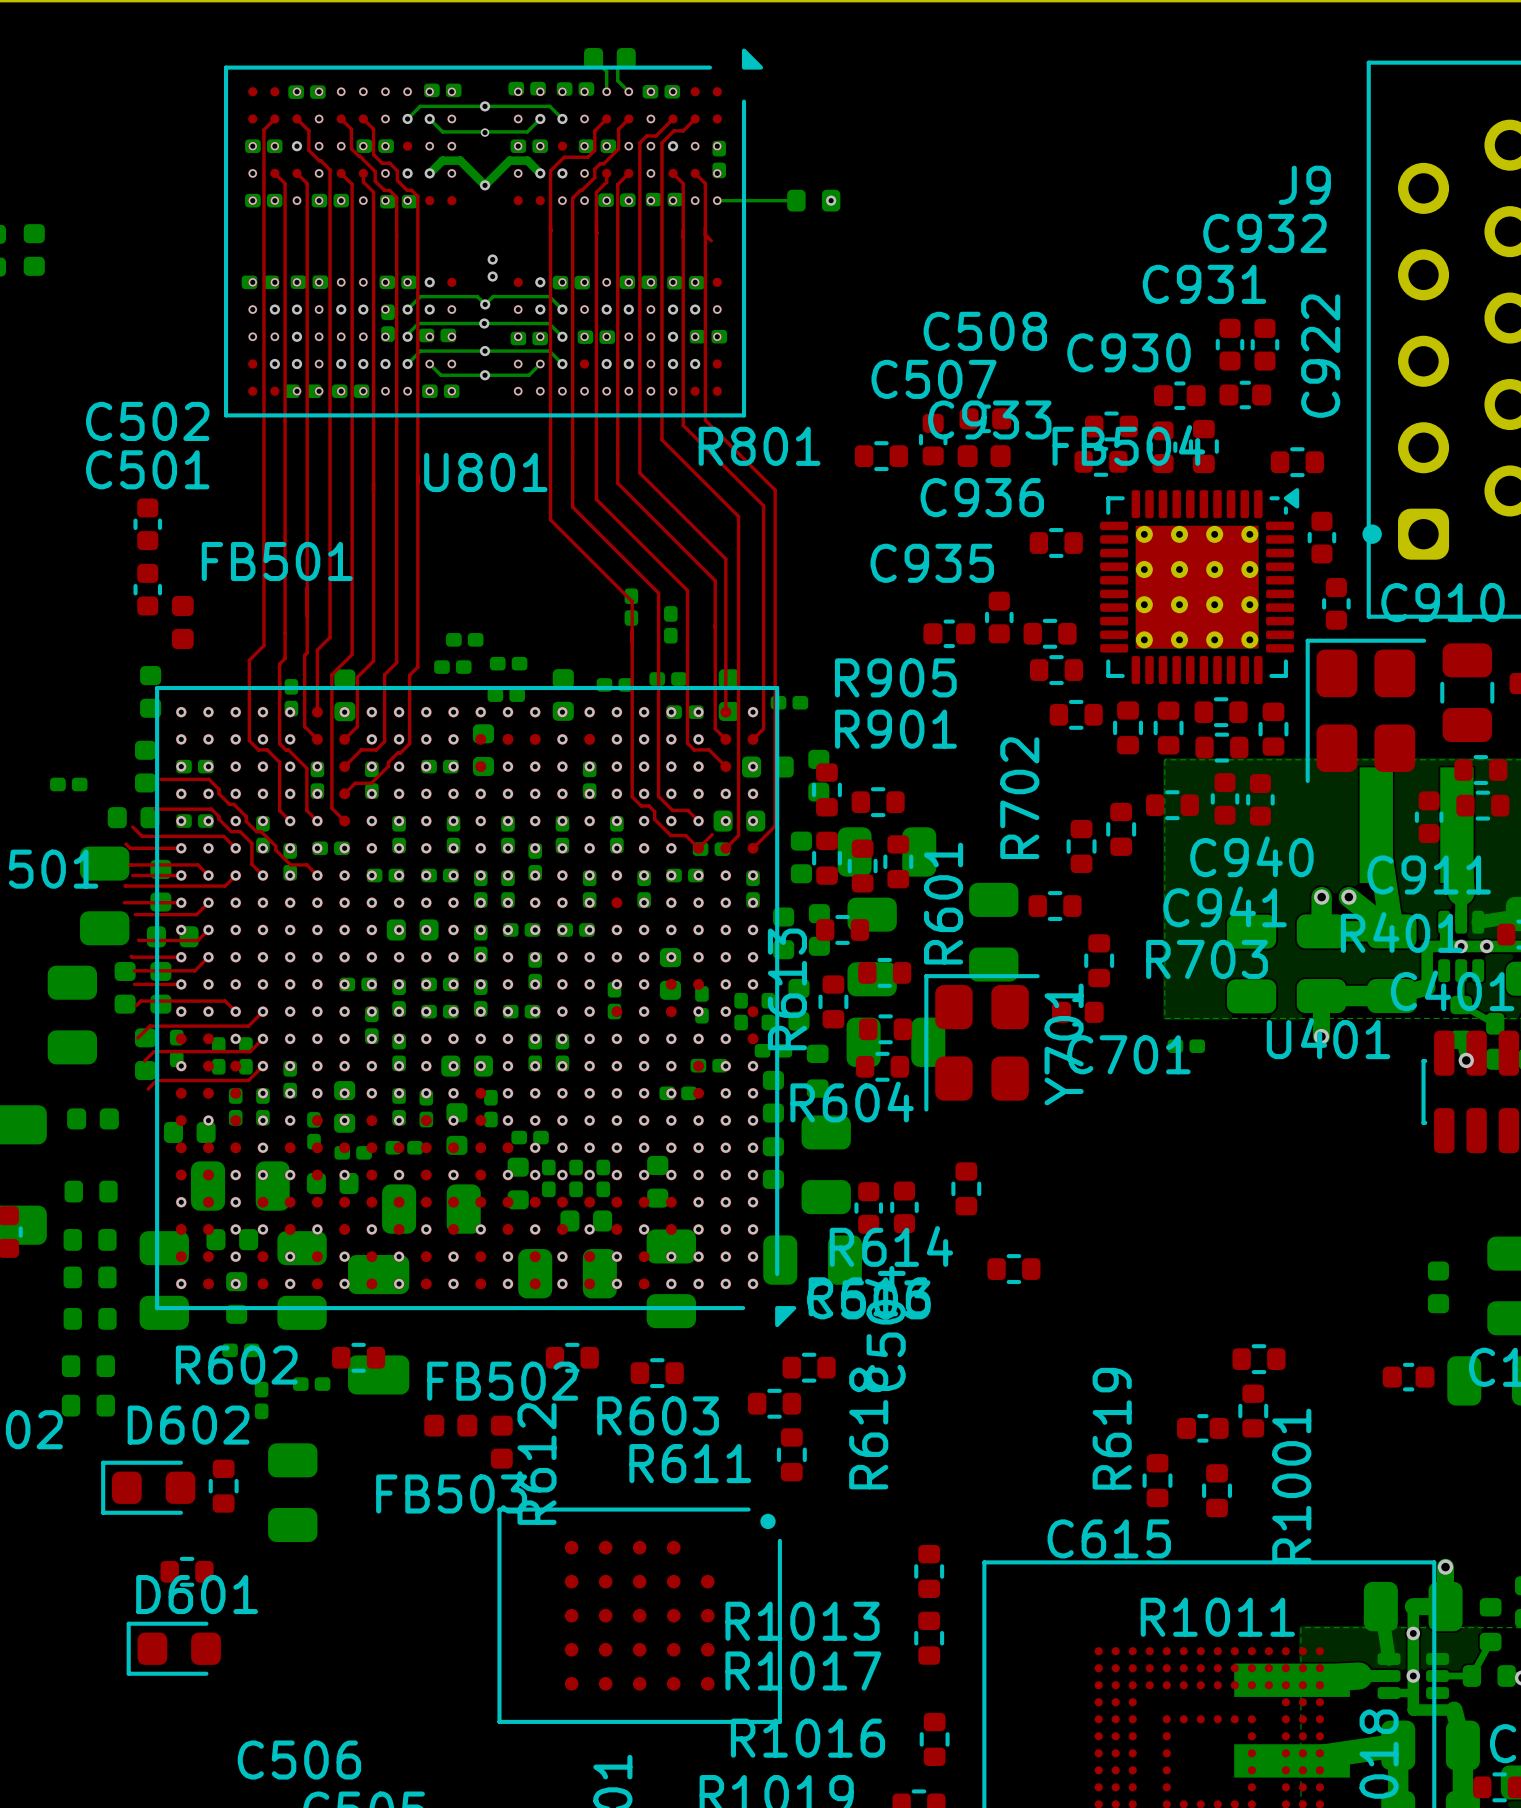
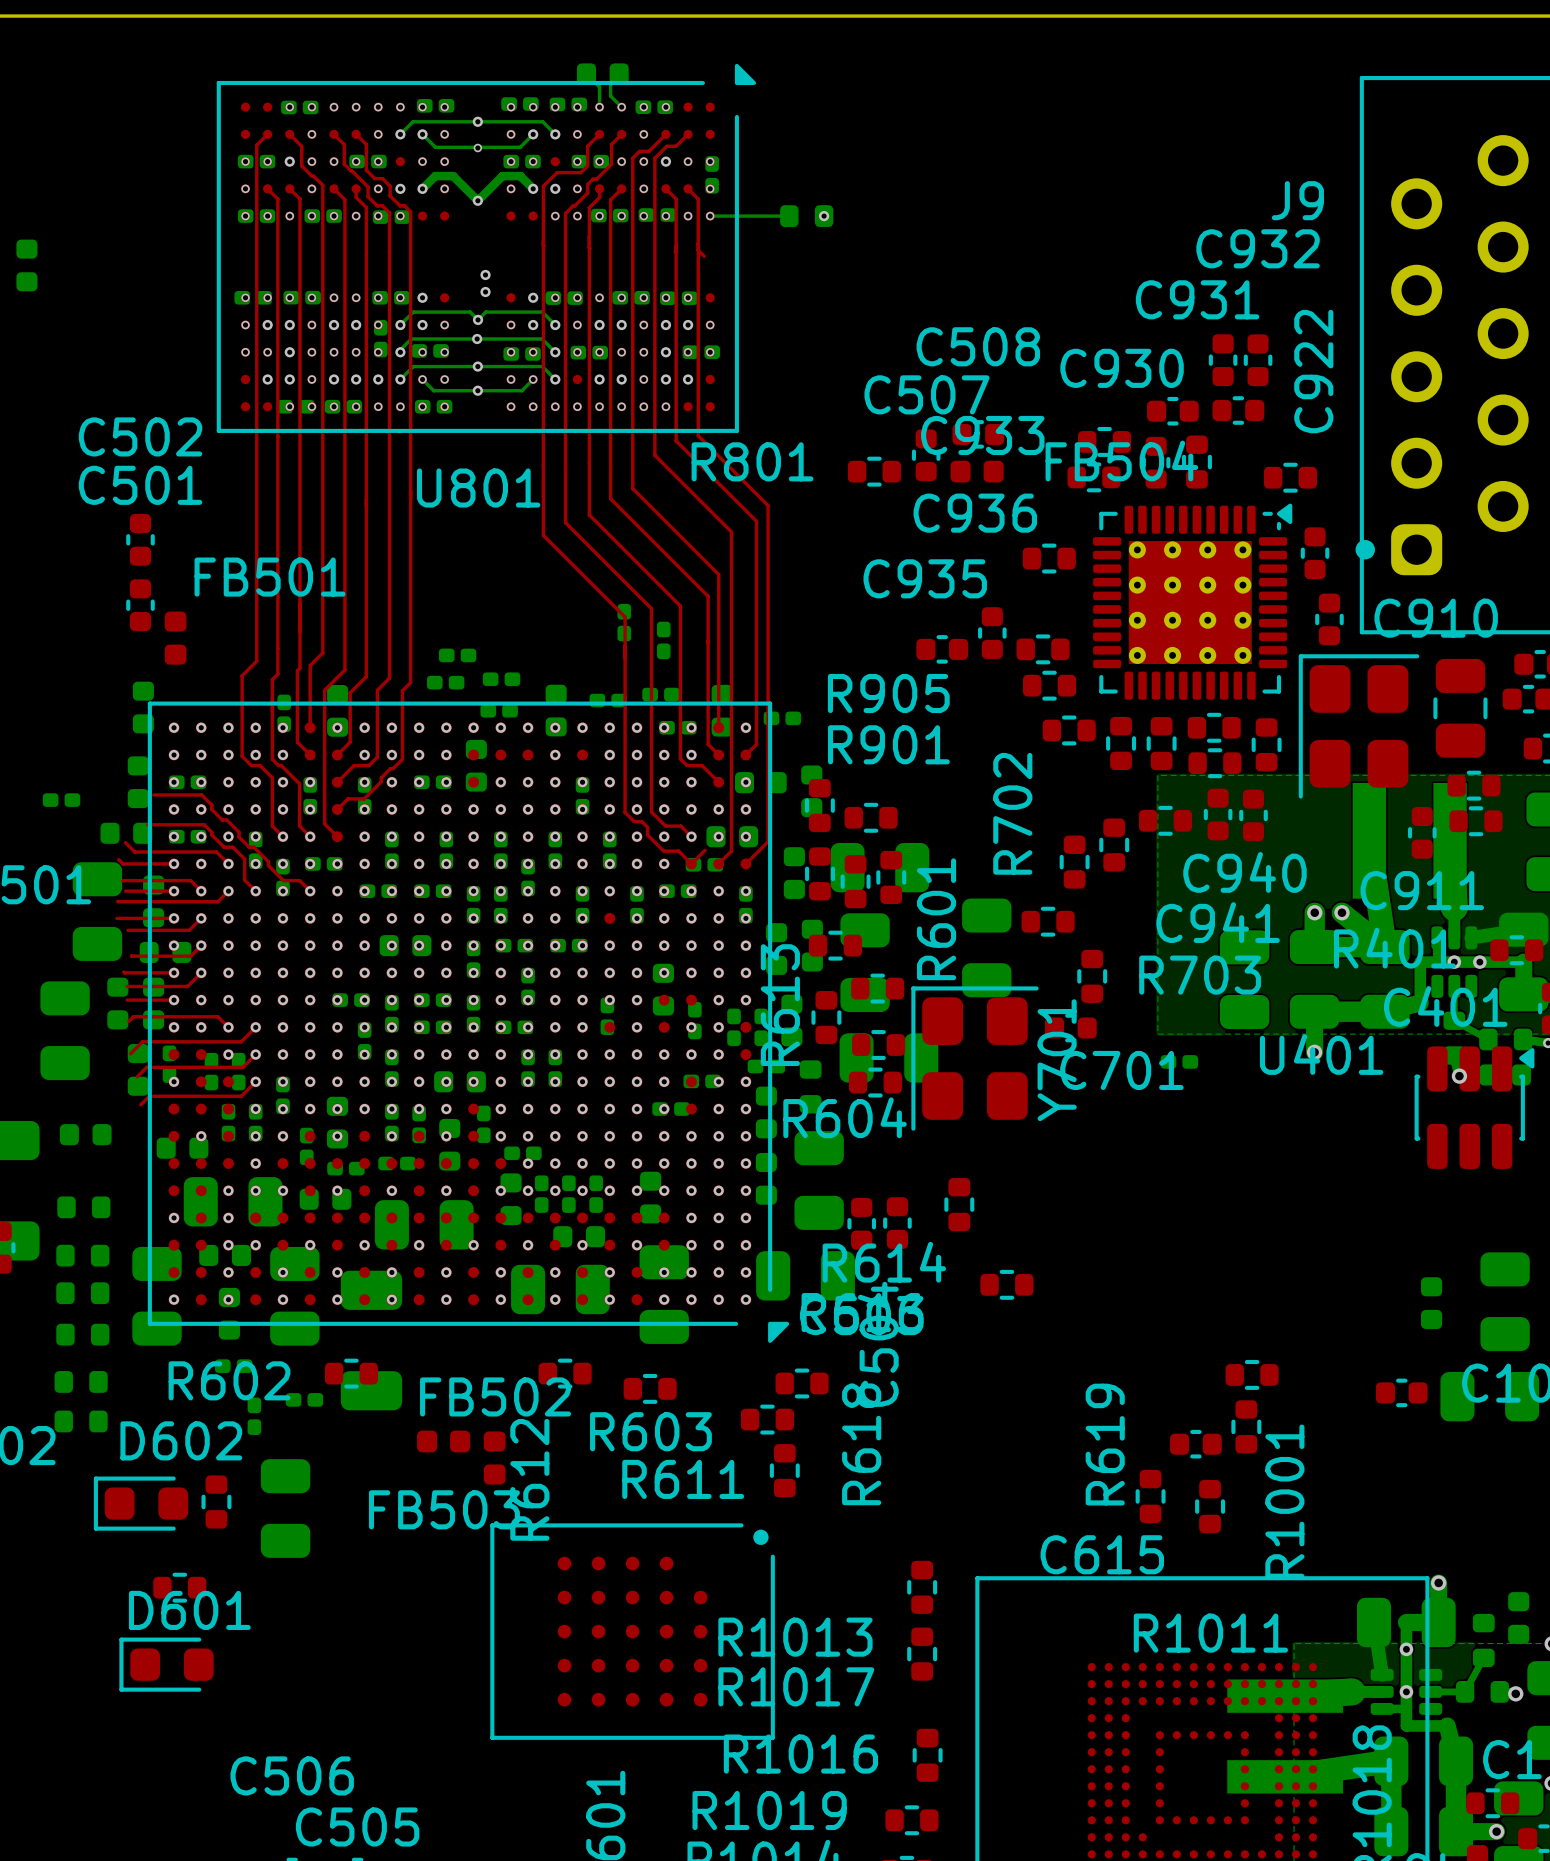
Y701 footprint: [924, 974, 1040, 1112] -> [911, 986, 1039, 1131]

